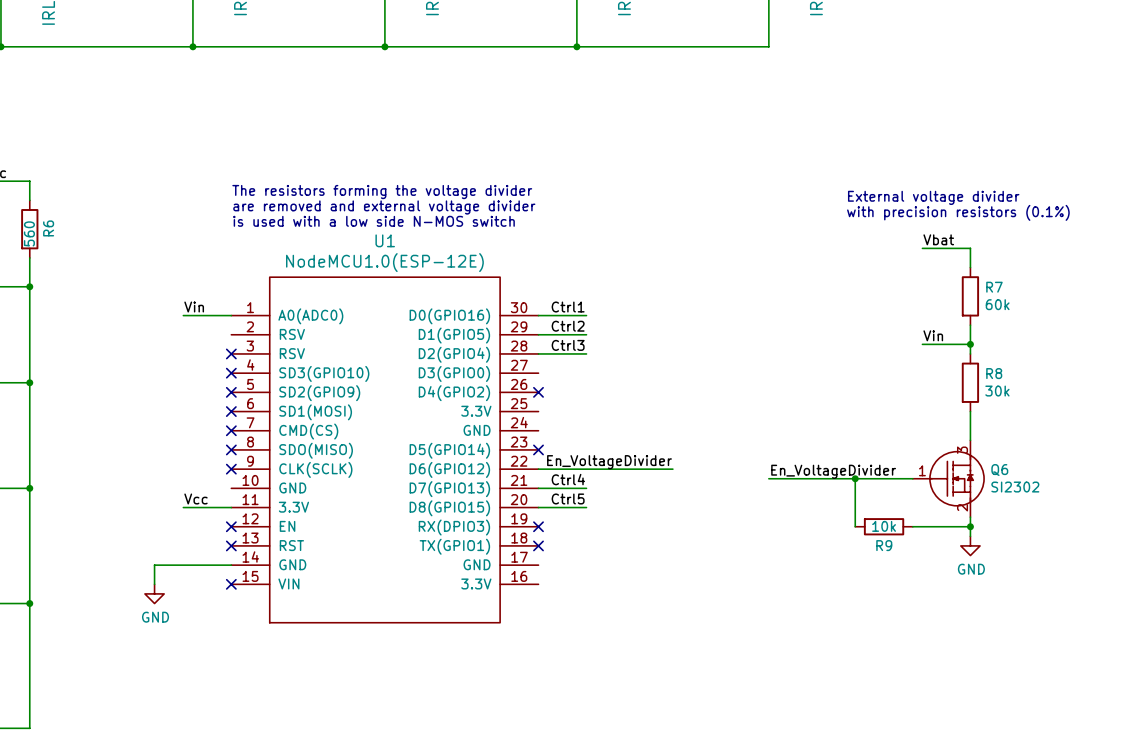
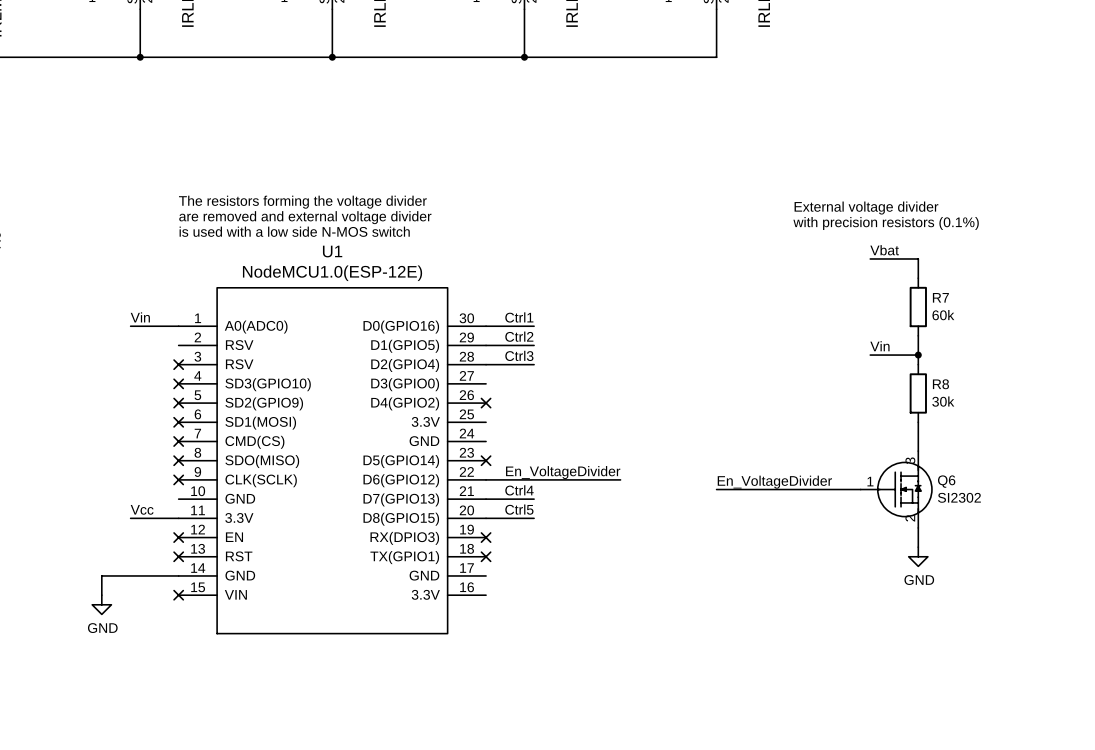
wire: (855, 478) (855, 526) -> none
junction: (855, 478) -> none
R9: 10k (884, 526) -> none
wire: (912, 526) (970, 526) -> none
junction: (970, 526) -> none

